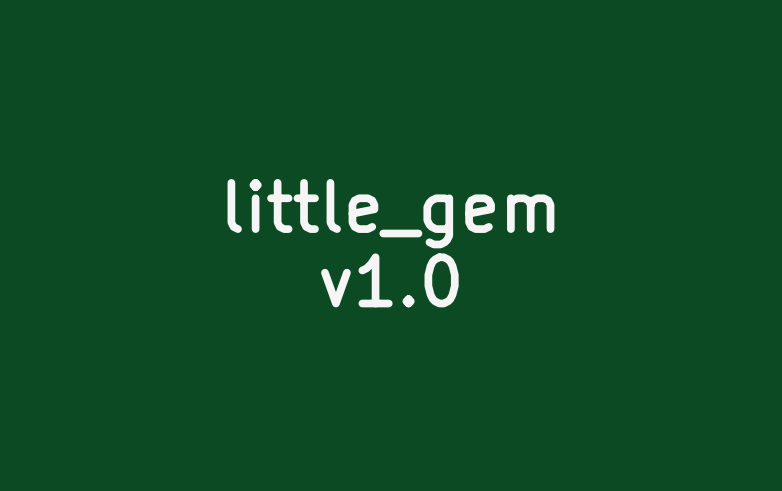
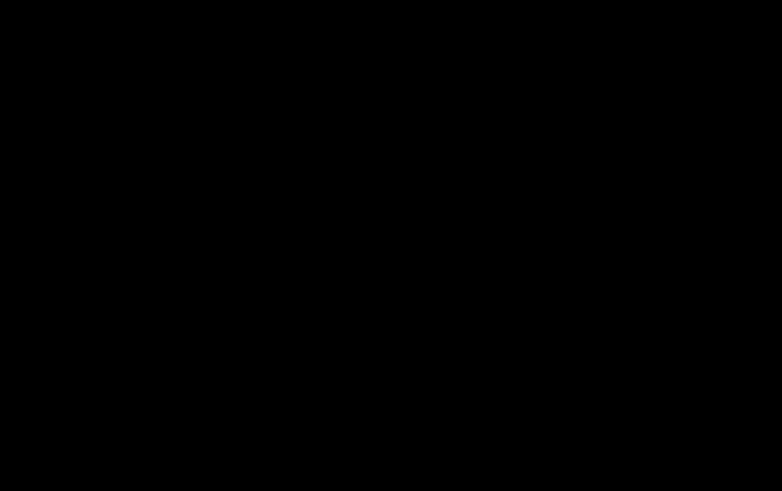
text: little_gem (390, 213) -> none
text: v1.0 (389, 280) -> none

